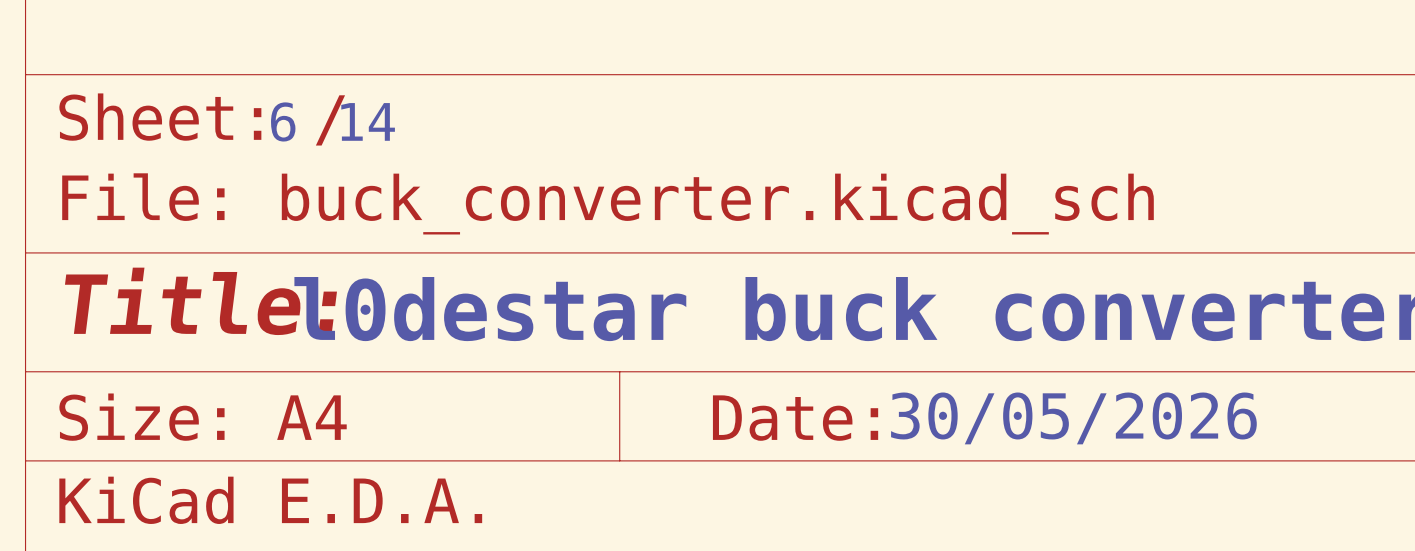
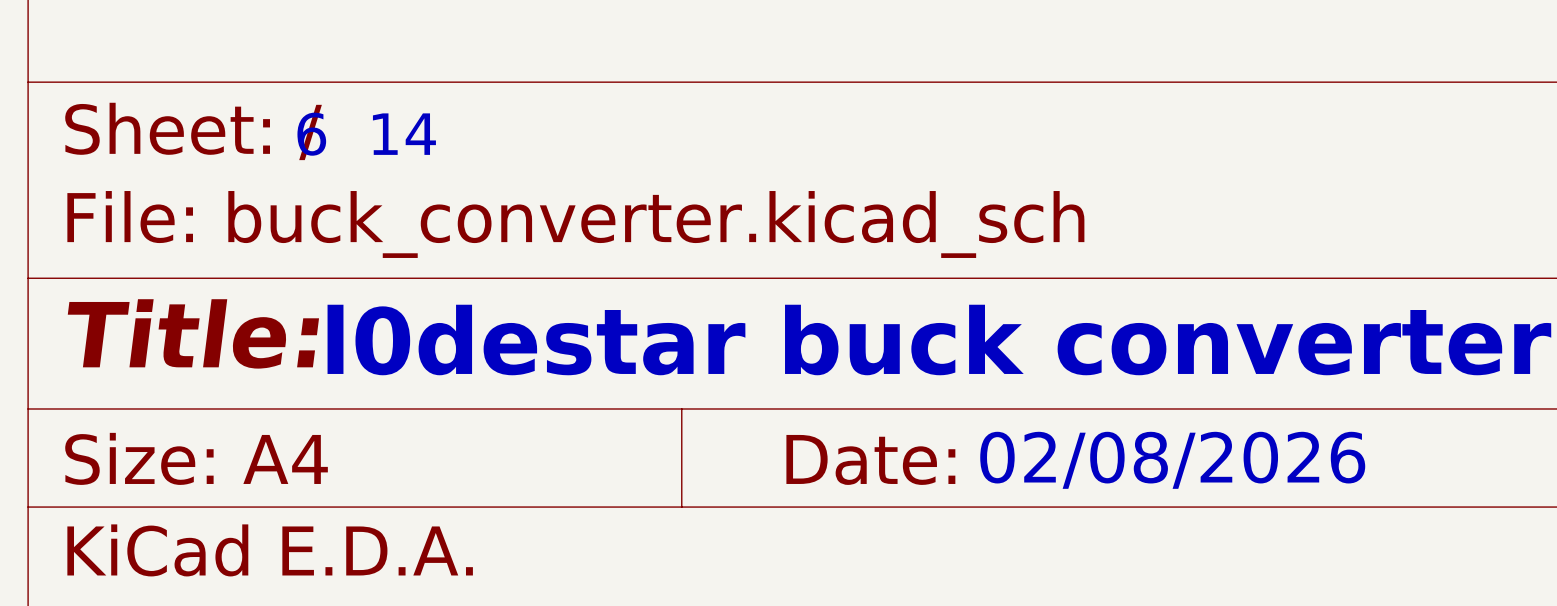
text: 30/05/2026 (1073, 418) -> 02/08/2026 (1172, 460)

